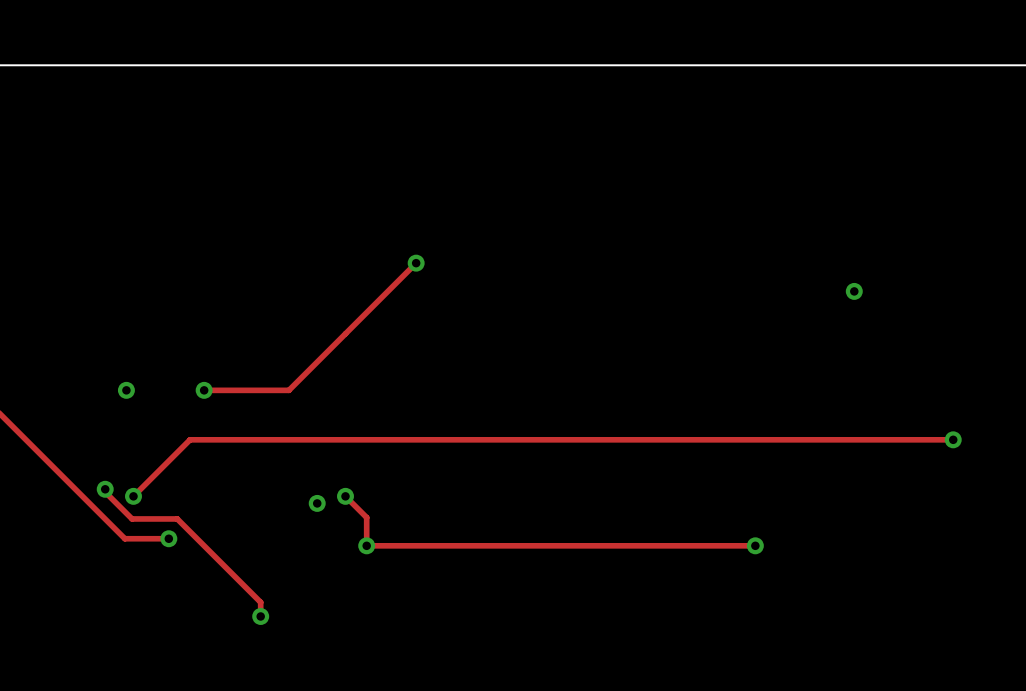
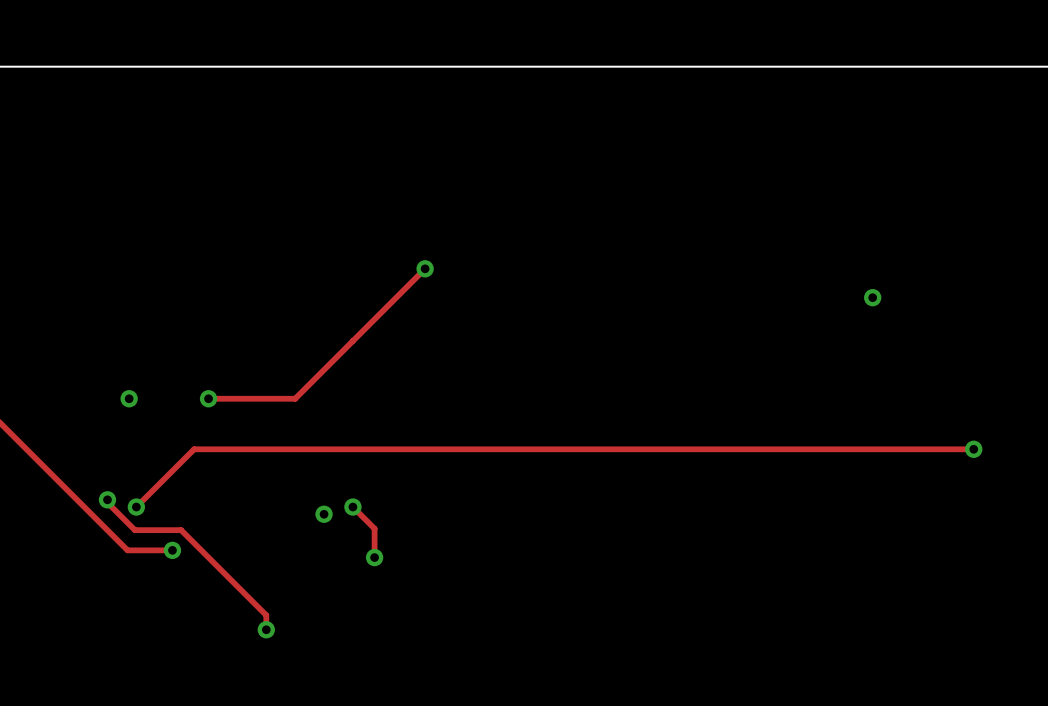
track: (366, 545) (755, 545) -> none
via: (755, 545) -> none

